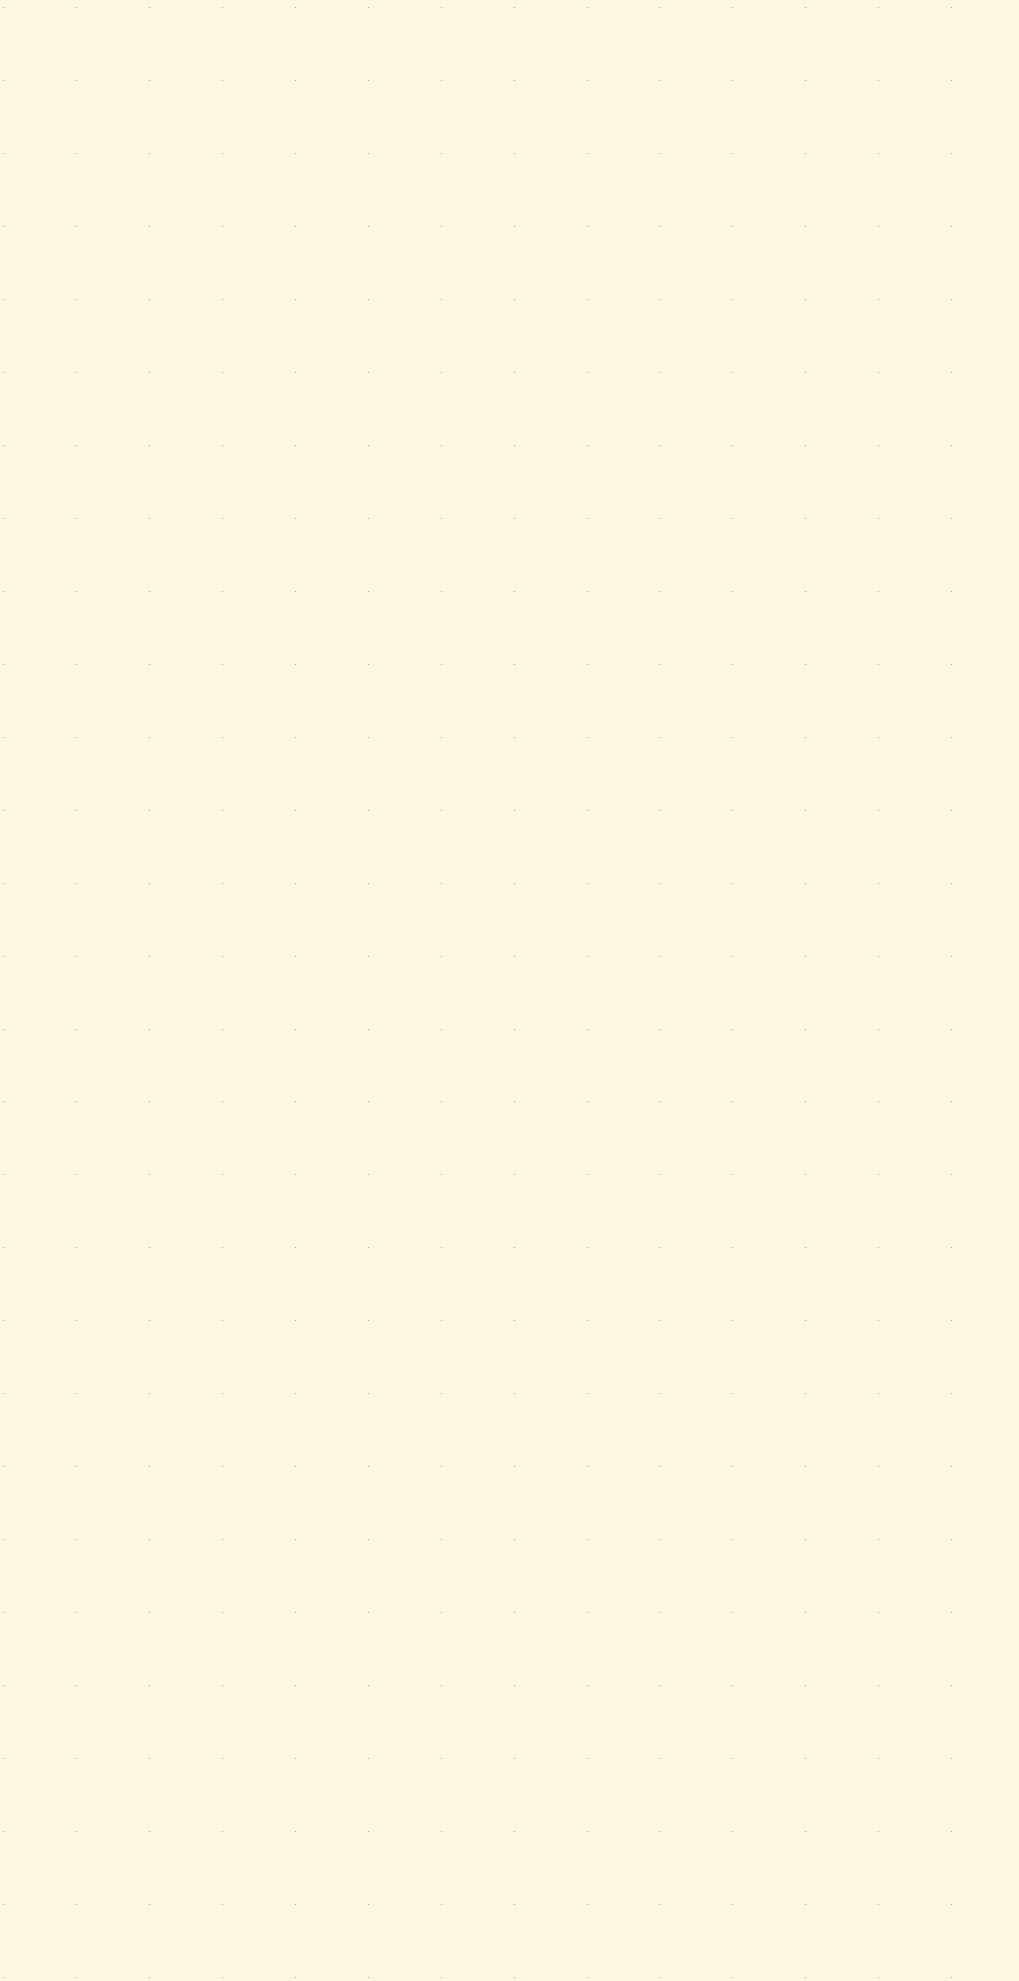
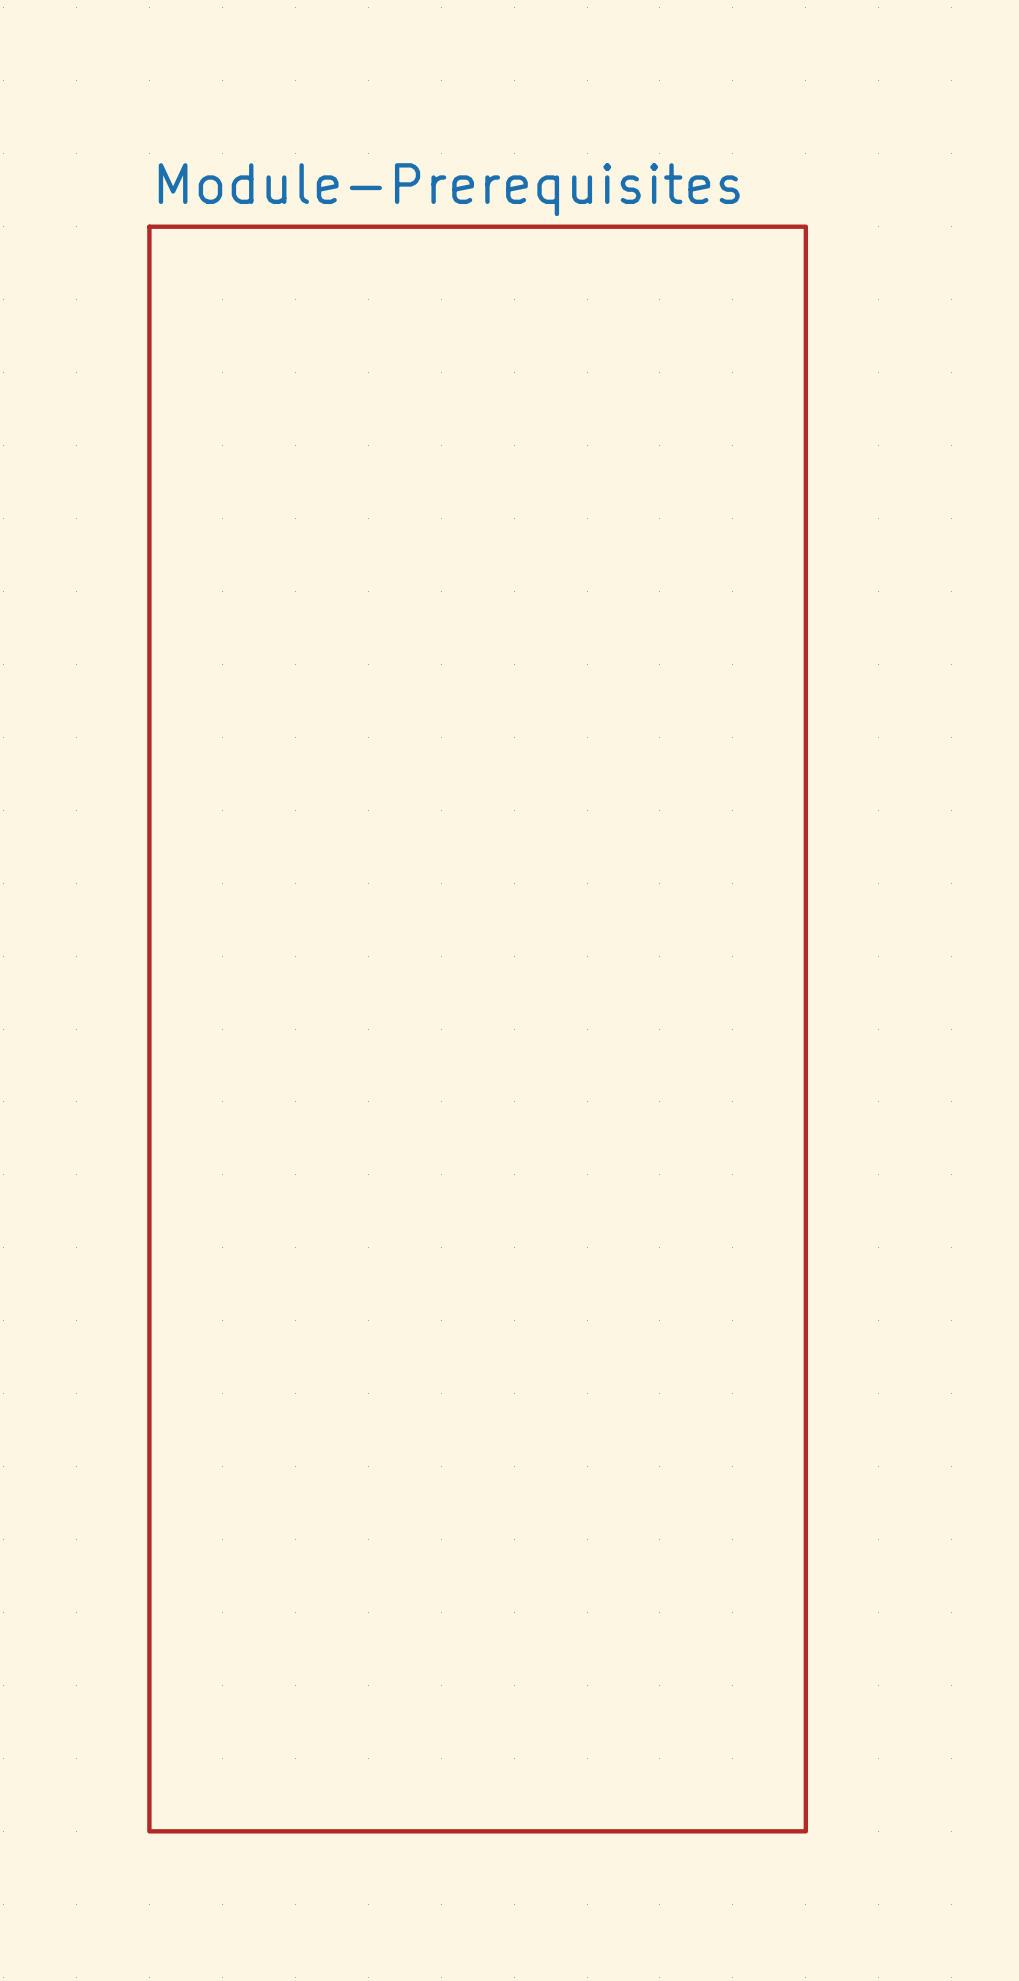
sheet Module-Prerequisites: none -> (477, 1029)

